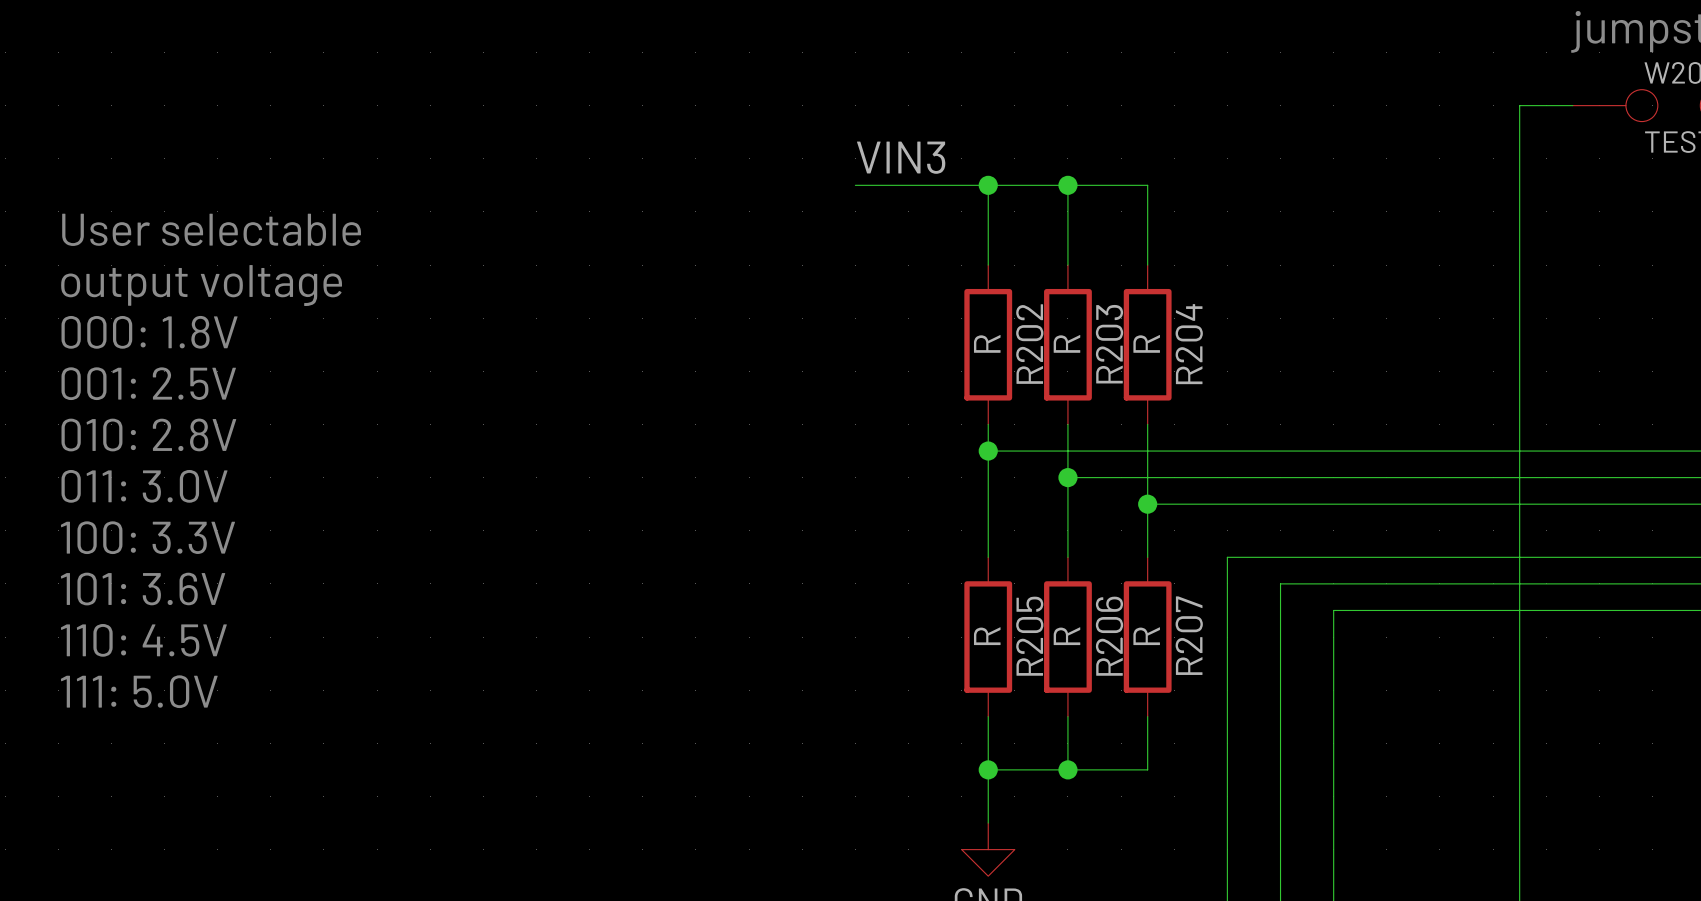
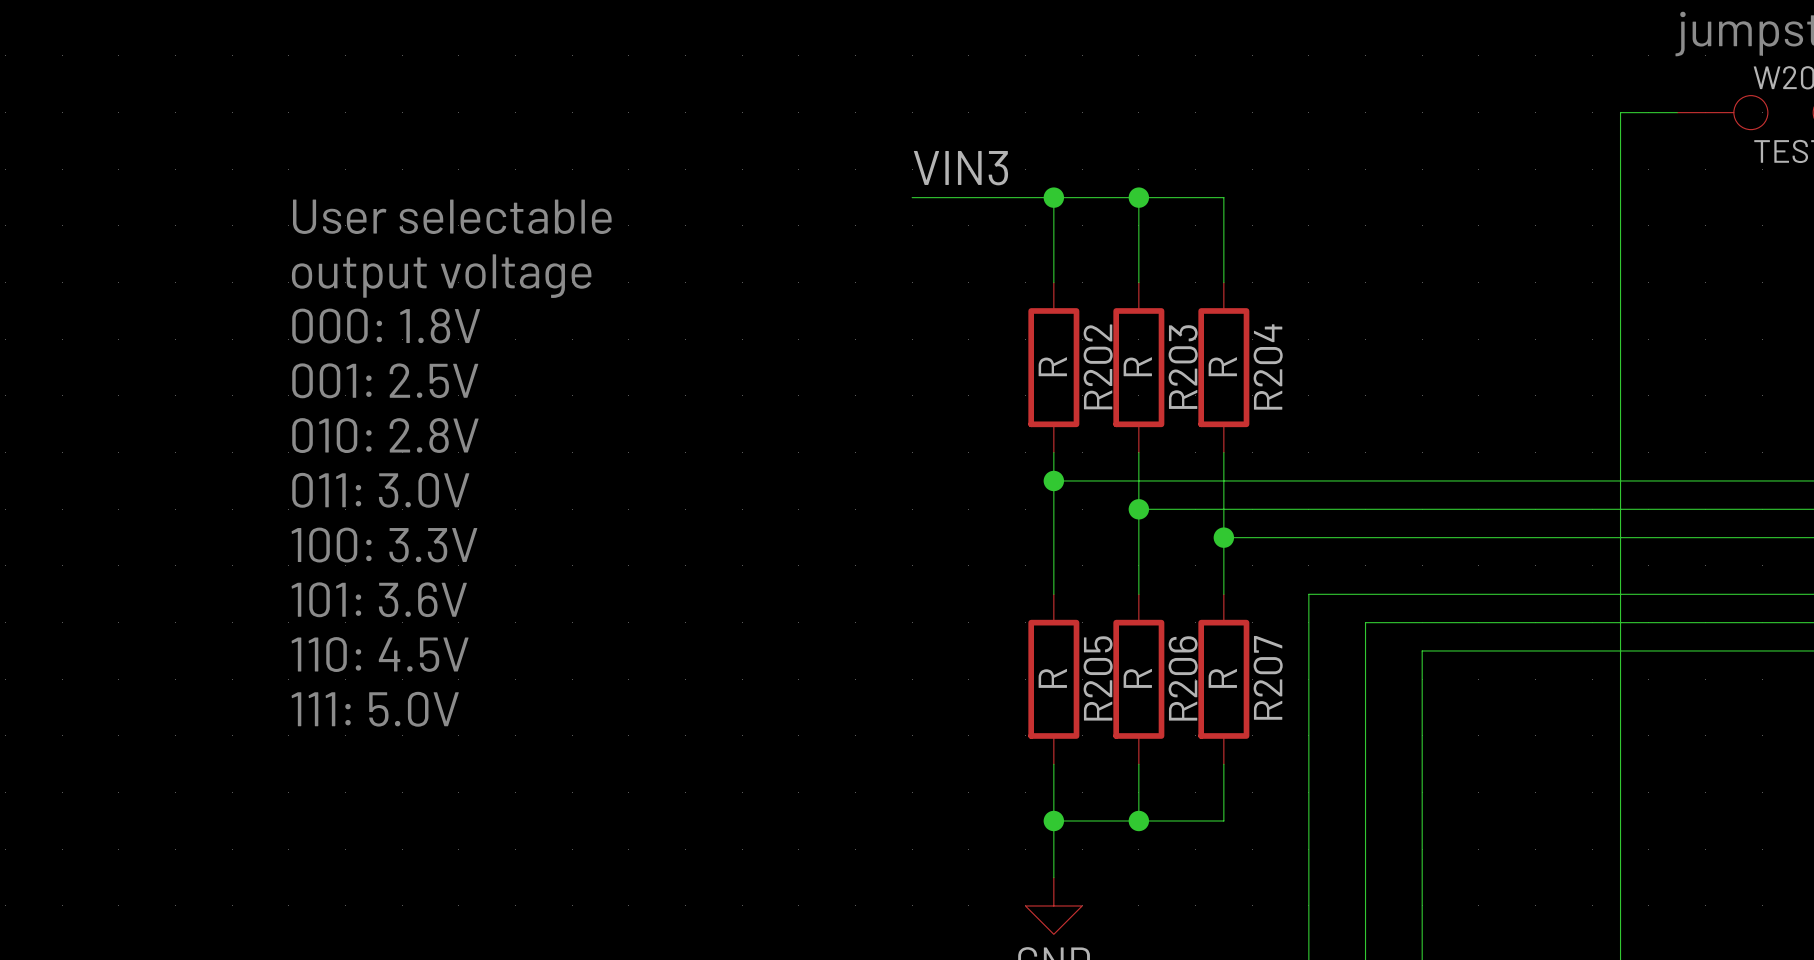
text position: User selectable (211, 229) -> User selectable (452, 216)
text position: output voltage (201, 285) -> output voltage (441, 276)
text position: 000: 1.8V (149, 332) -> 000: 1.8V (386, 326)
text position: 001: 2.5V (148, 383) -> 001: 2.5V (385, 380)
text position: 010: 2.8V (148, 435) -> 010: 2.8V (385, 435)
text position: 011: 3.0V (144, 486) -> 011: 3.0V (380, 490)
text position: 100: 3.3V (148, 537) -> 100: 3.3V (384, 545)
text position: 101: 3.6V (143, 589) -> 101: 3.6V (379, 599)
text position: 110: 4.5V (143, 640) -> 110: 4.5V (380, 654)
text position: 111: 5.0V (139, 691) -> 111: 5.0V (375, 709)

